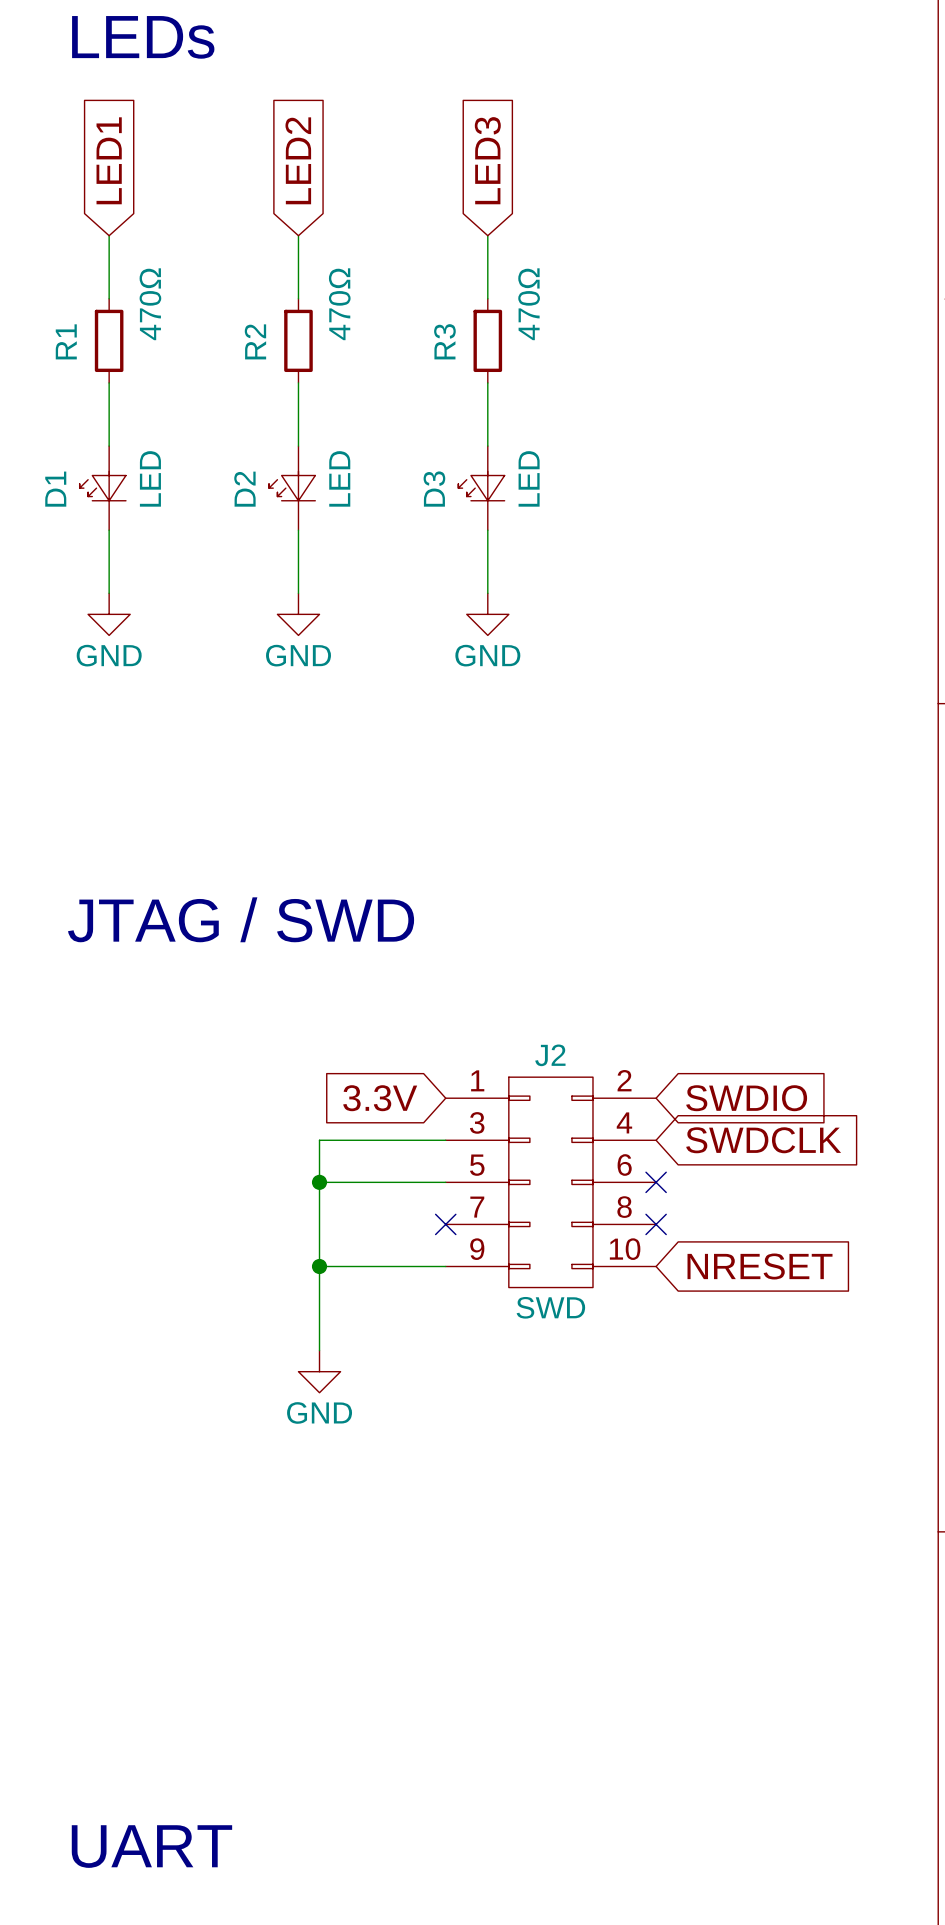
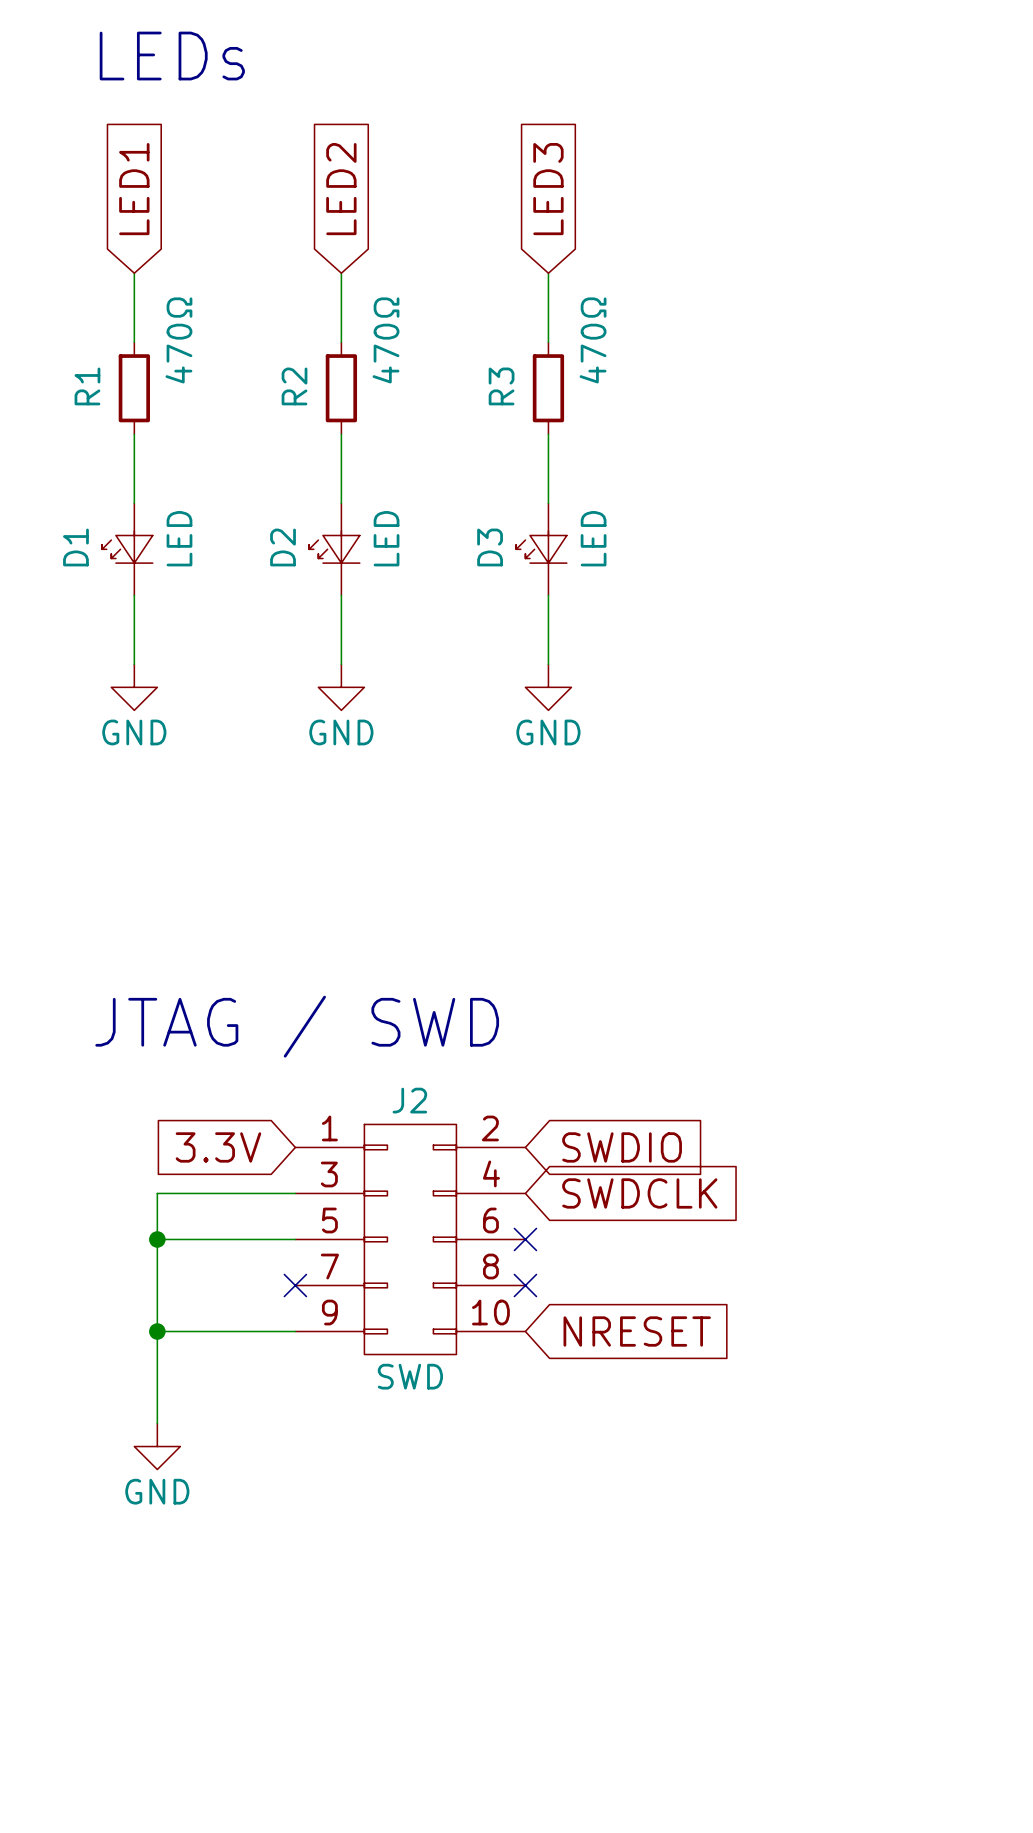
global label position: 3.3V (380, 1098) -> 3.3V (218, 1147)
global label position: SWDIO (746, 1098) -> SWDIO (622, 1147)
junction: none -> (157, 1239)
no-connect mark: none -> (525, 1239)
wire: (445, 1140) (319, 1140) (319, 1350) -> (295, 1193) (157, 1193) (157, 1423)
global label position: SWDCLK (763, 1140) -> SWDCLK (639, 1193)
no-connect mark: none -> (295, 1285)
no-connect mark: none -> (525, 1285)
wire: (319, 1182) (445, 1182) -> (157, 1239) (295, 1239)
junction: (319, 1182) -> none
J2 position: (550, 1182) -> (410, 1239)
no-connect mark: (656, 1182) -> none
junction: none -> (157, 1331)
no-connect mark: (445, 1224) -> none
no-connect mark: (656, 1224) -> none
wire: (319, 1266) (445, 1266) -> (157, 1331) (295, 1331)
junction: (319, 1266) -> none
global label position: NRESET (760, 1266) -> NRESET (637, 1331)
power symbol position: GND (319, 1371) -> GND (157, 1446)

